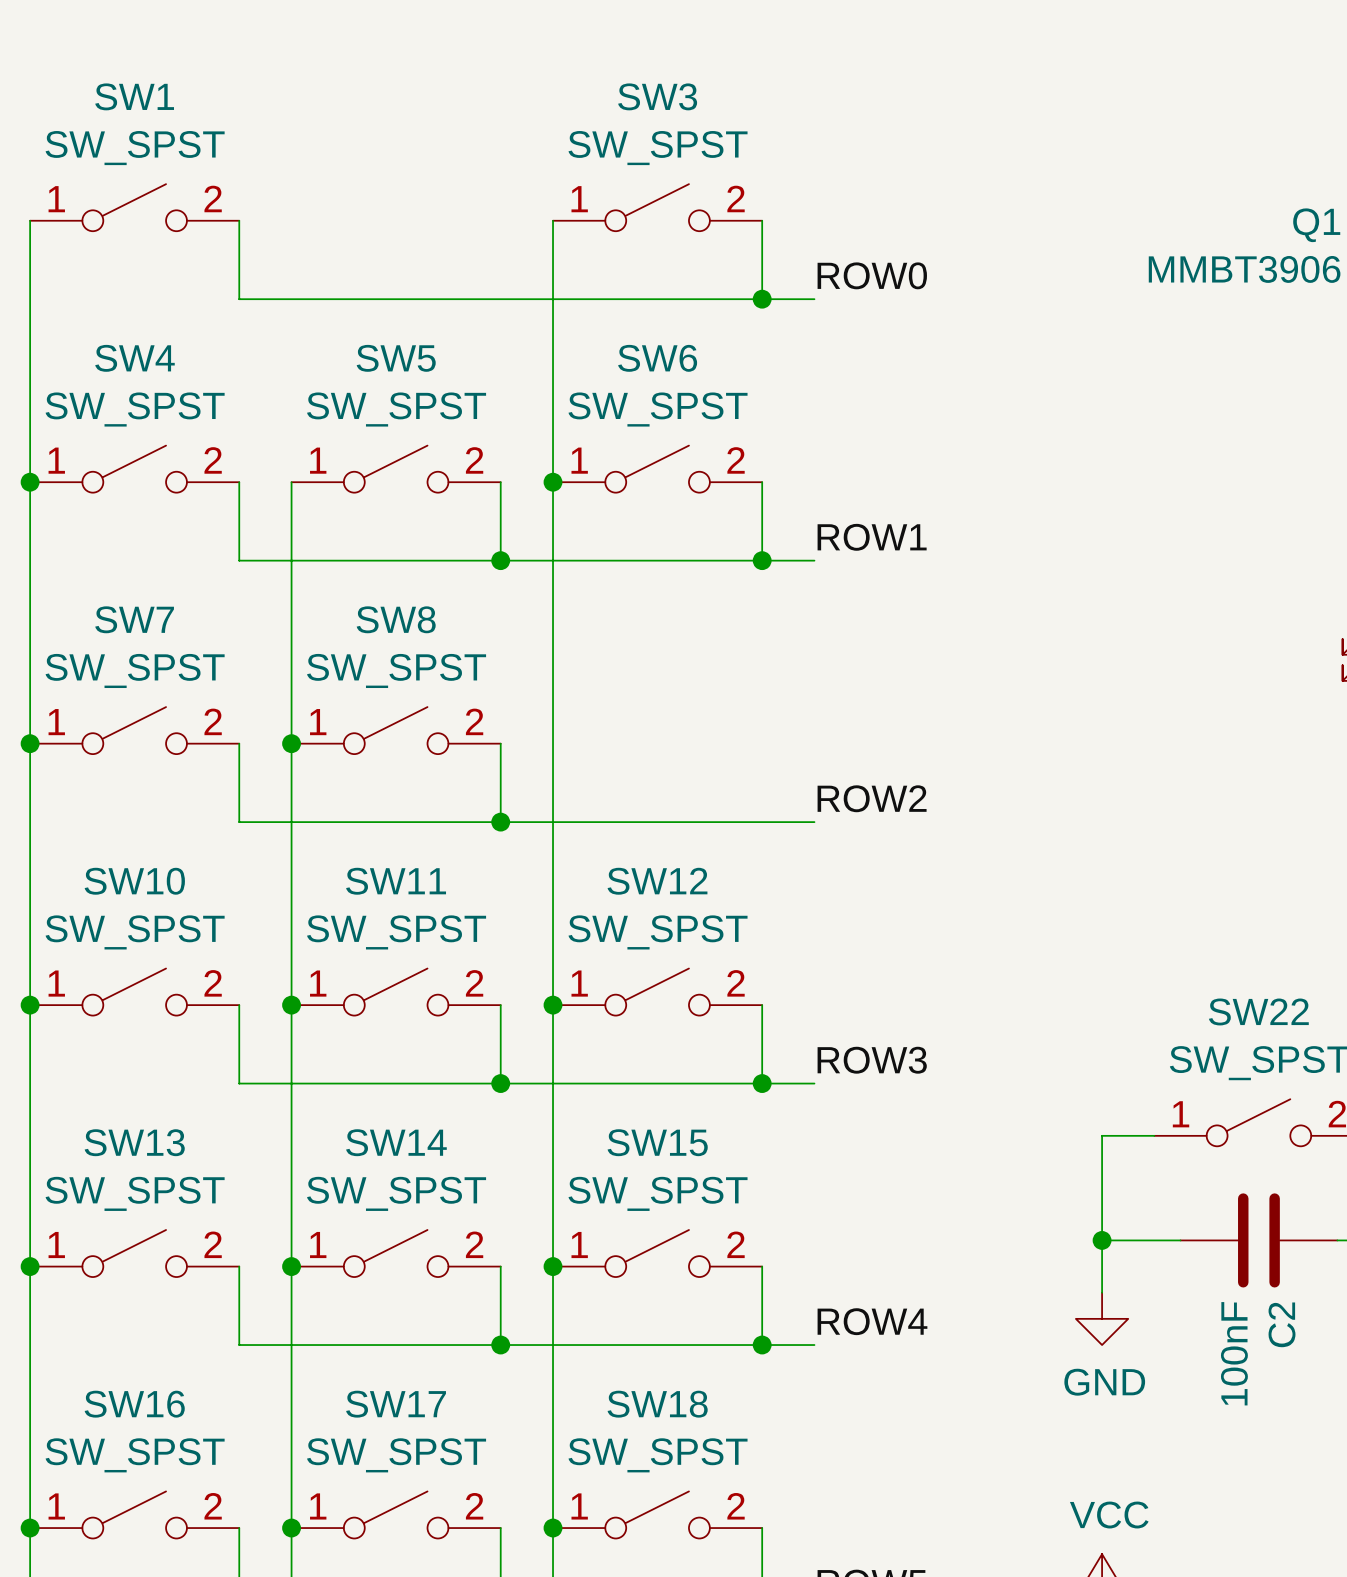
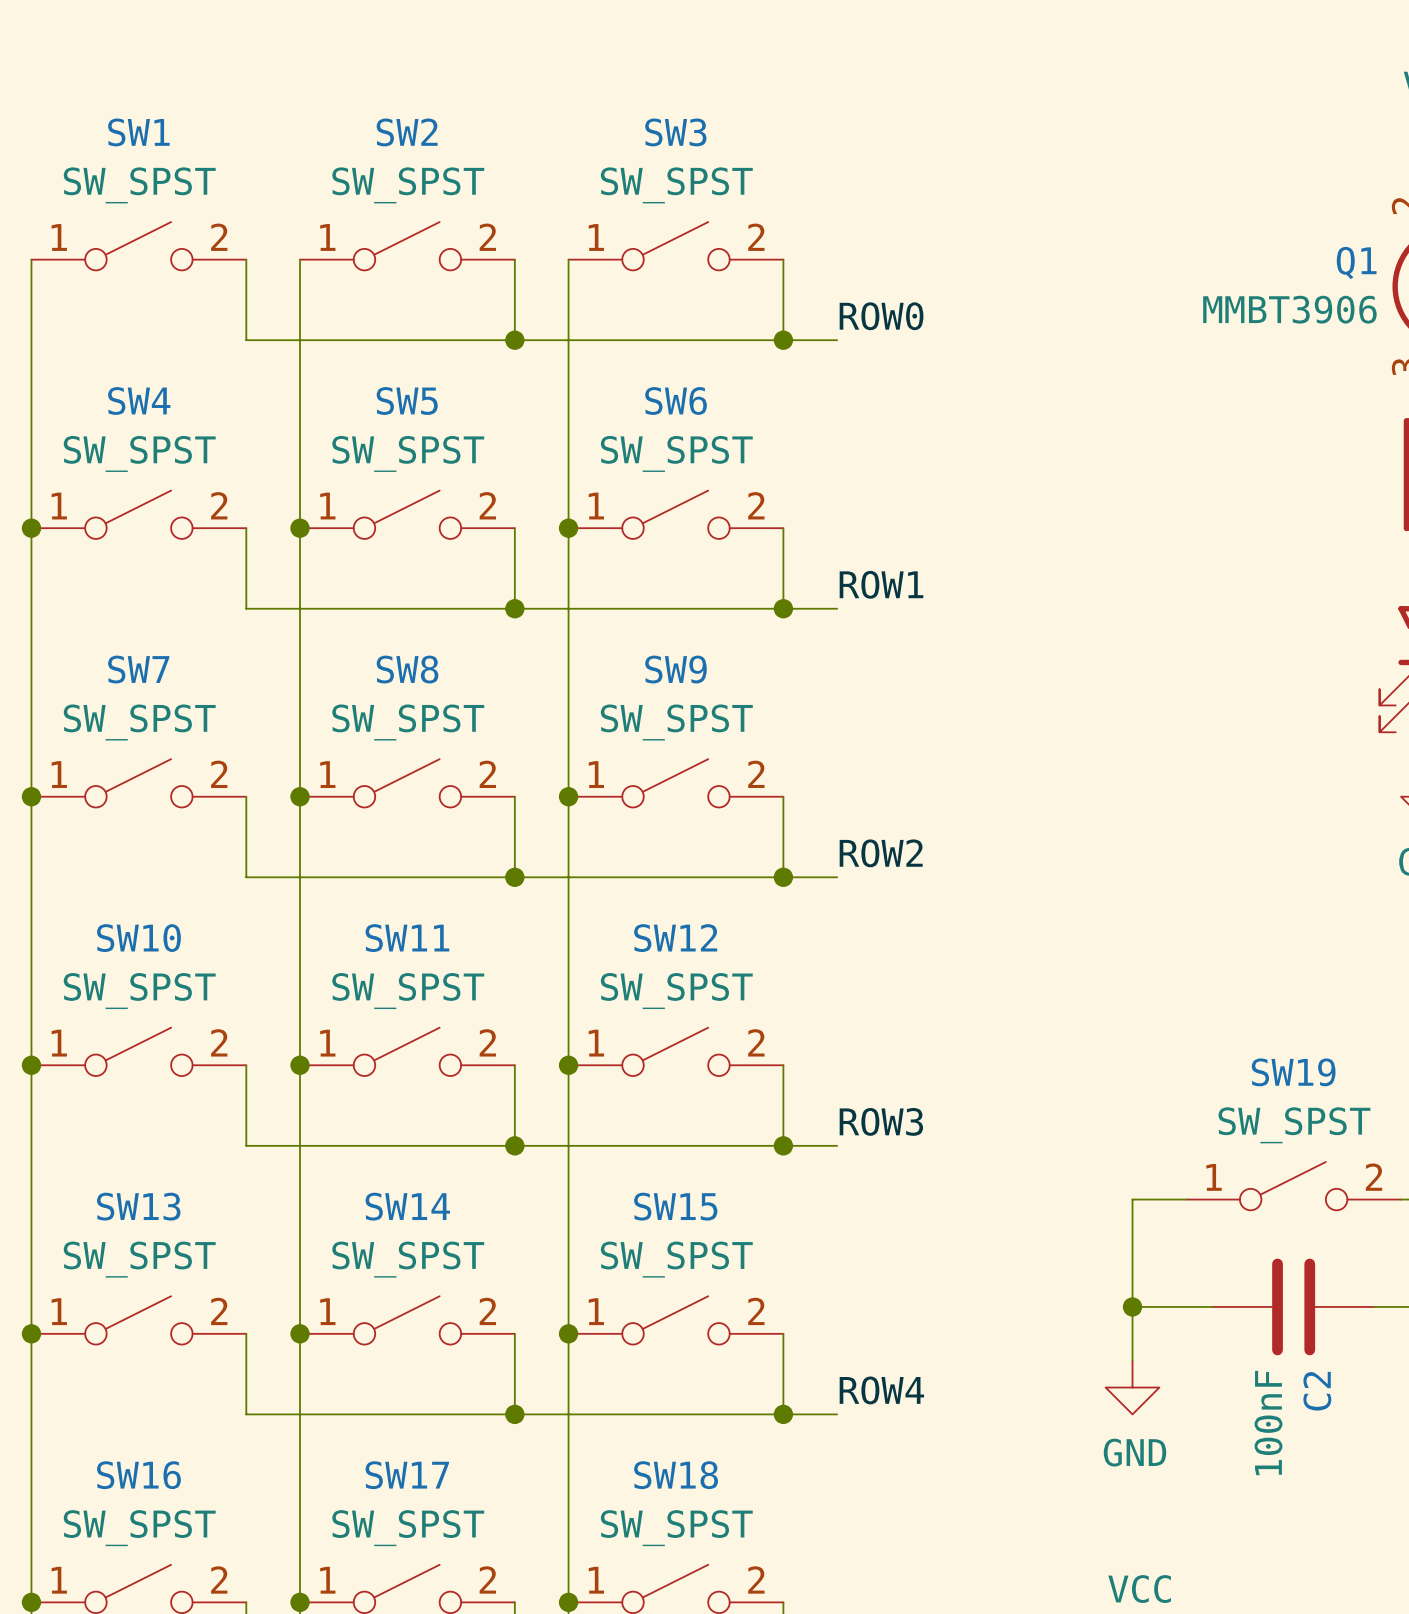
SW2: none -> SW_SPST (407, 246)
wire: none -> (300, 259) (300, 528)
wire: none -> (514, 259) (514, 340)
junction: none -> (514, 340)
junction: none -> (300, 528)
SW9: none -> SW_SPST (675, 783)
junction: none -> (568, 796)
wire: none -> (783, 796) (783, 877)
junction: none -> (783, 877)
SW22 name: SW22 (1258, 1011) -> SW19 (1293, 1072)

